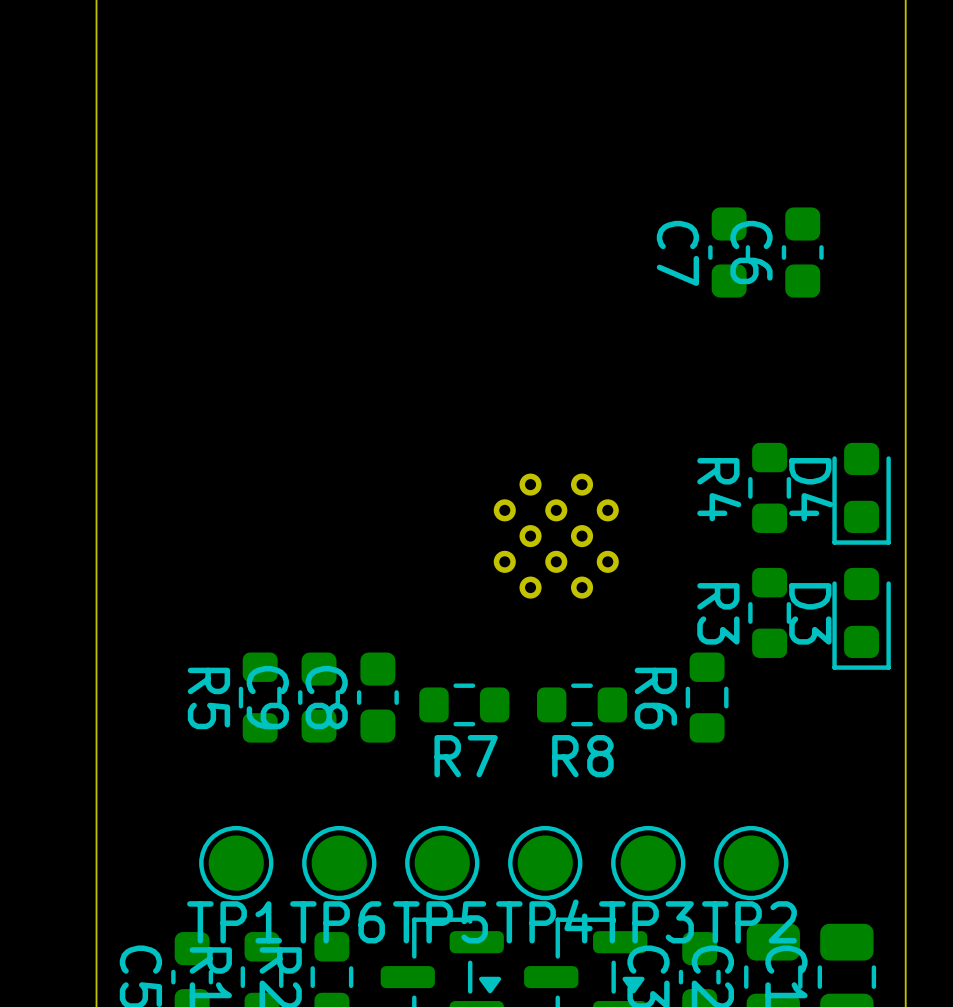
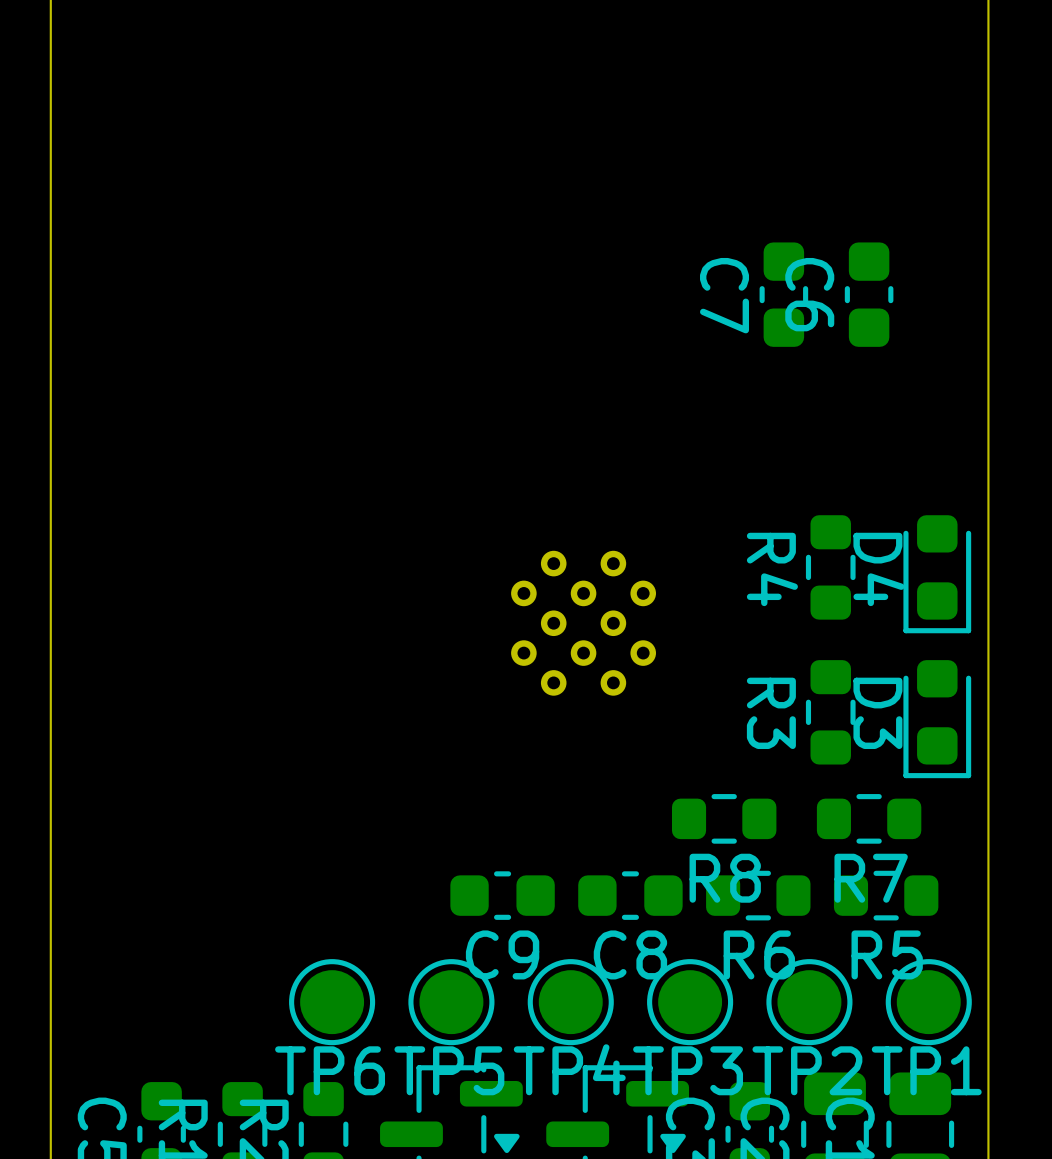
R5 rotation: 0° (260, 697) -> 90° clockwise (886, 895)
R5 position: (260, 697) -> (886, 895)
C9 name position: C9 (267, 697) -> C9 (502, 954)
C9 rotation: 0° (319, 697) -> 90° clockwise (502, 895)
C9 position: (319, 697) -> (502, 895)
C8 name position: C8 (326, 697) -> C8 (630, 954)
C8 rotation: 0° (377, 697) -> 90° clockwise (630, 895)
C8 position: (377, 697) -> (630, 895)
R6 rotation: 0° (707, 697) -> 90° clockwise (758, 895)
R6 position: (707, 697) -> (758, 895)
R5 name position: R5 (208, 698) -> R5 (887, 954)
R6 name position: R6 (655, 698) -> R6 (759, 954)
R7 position: (464, 704) -> (869, 818)
R8 position: (582, 704) -> (724, 818)
TP1 position: (236, 863) -> (928, 1002)

